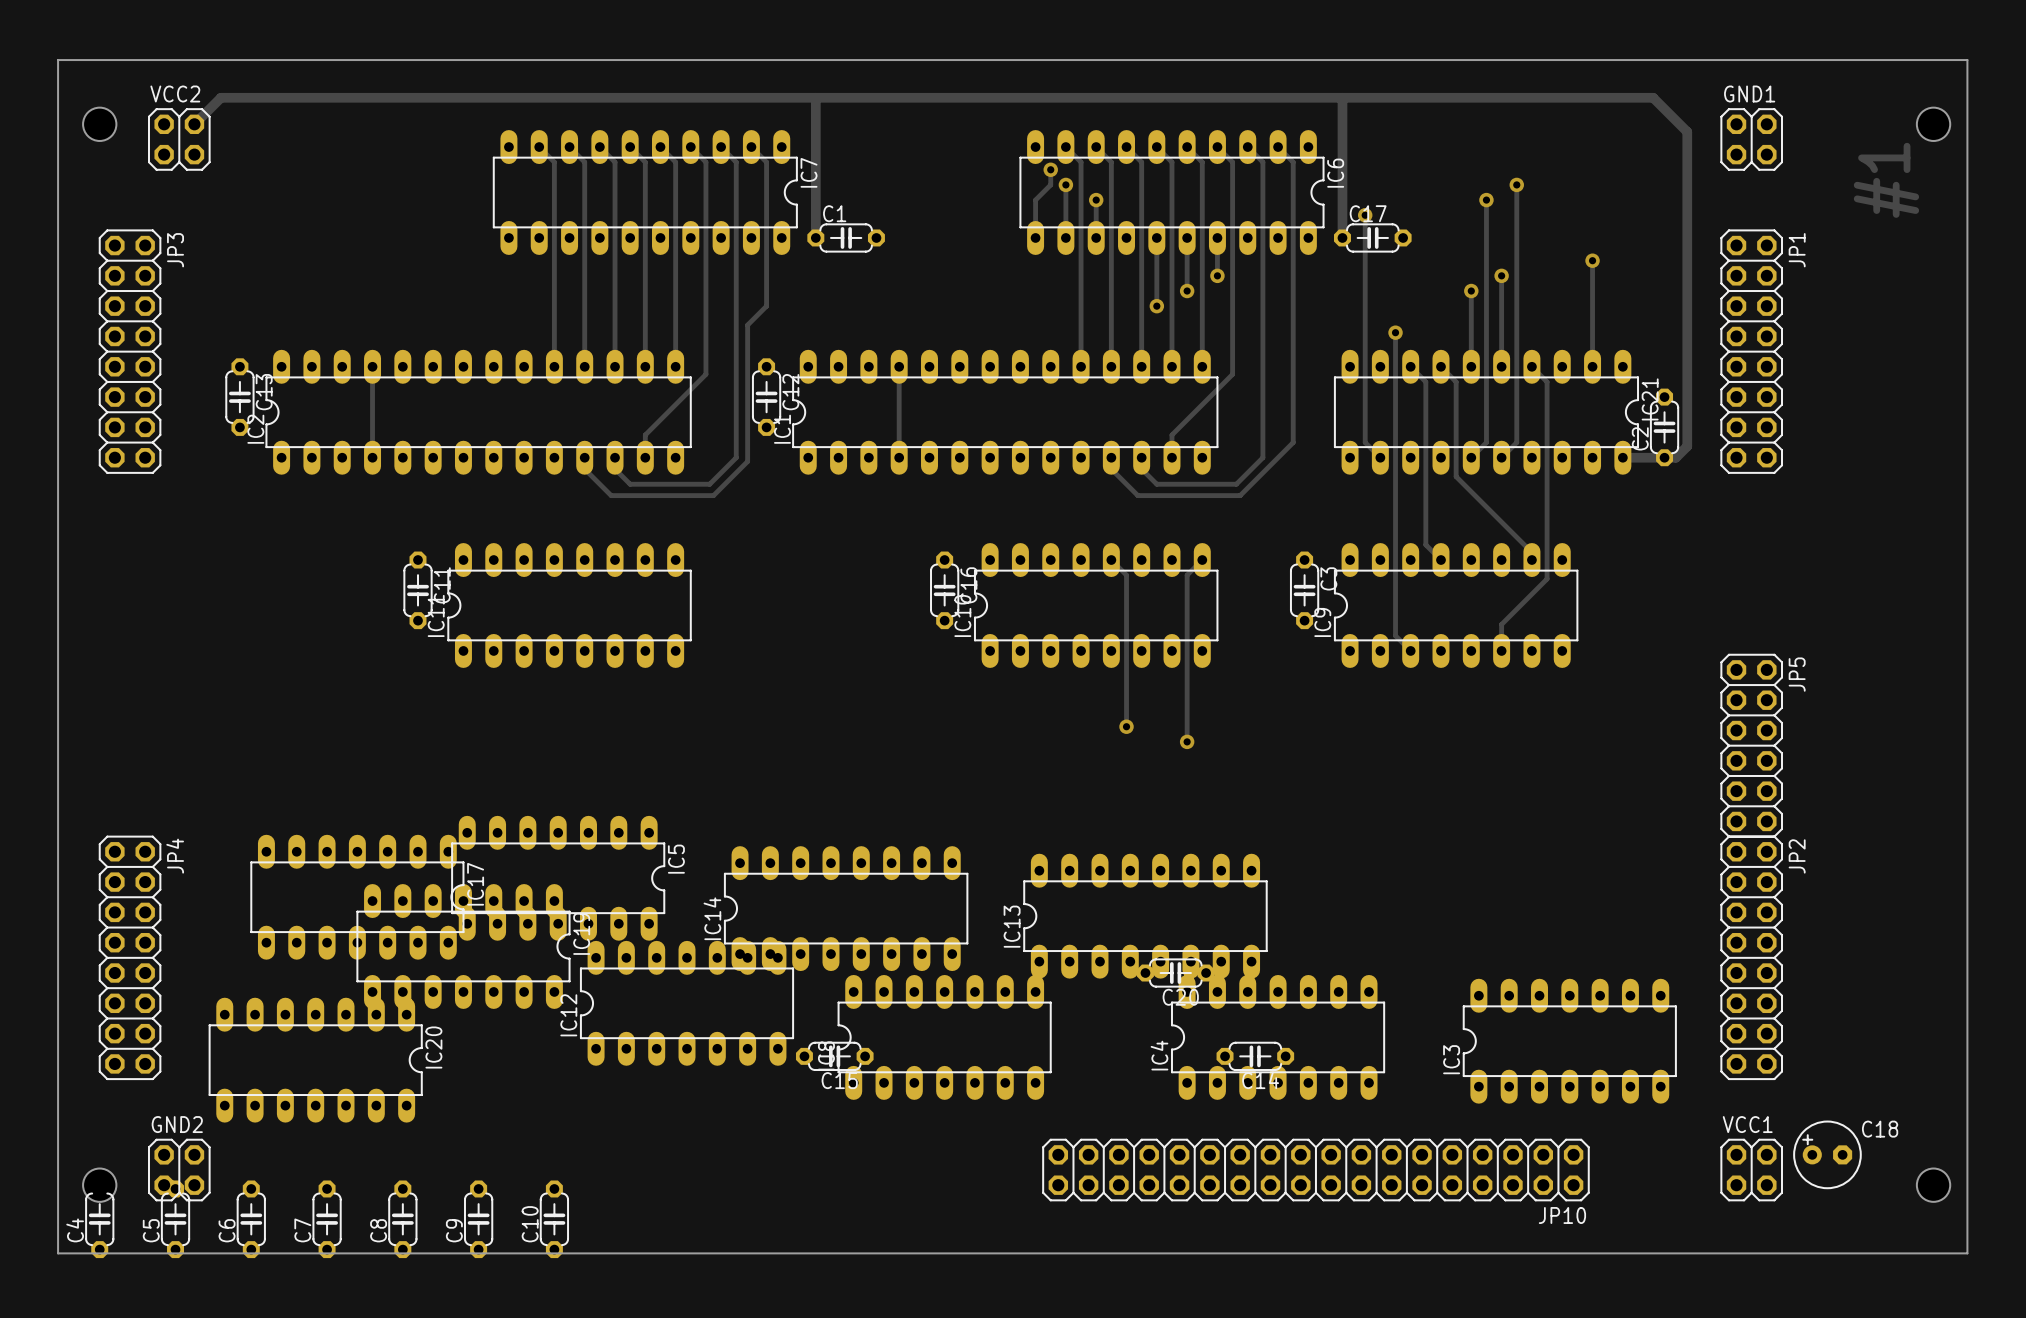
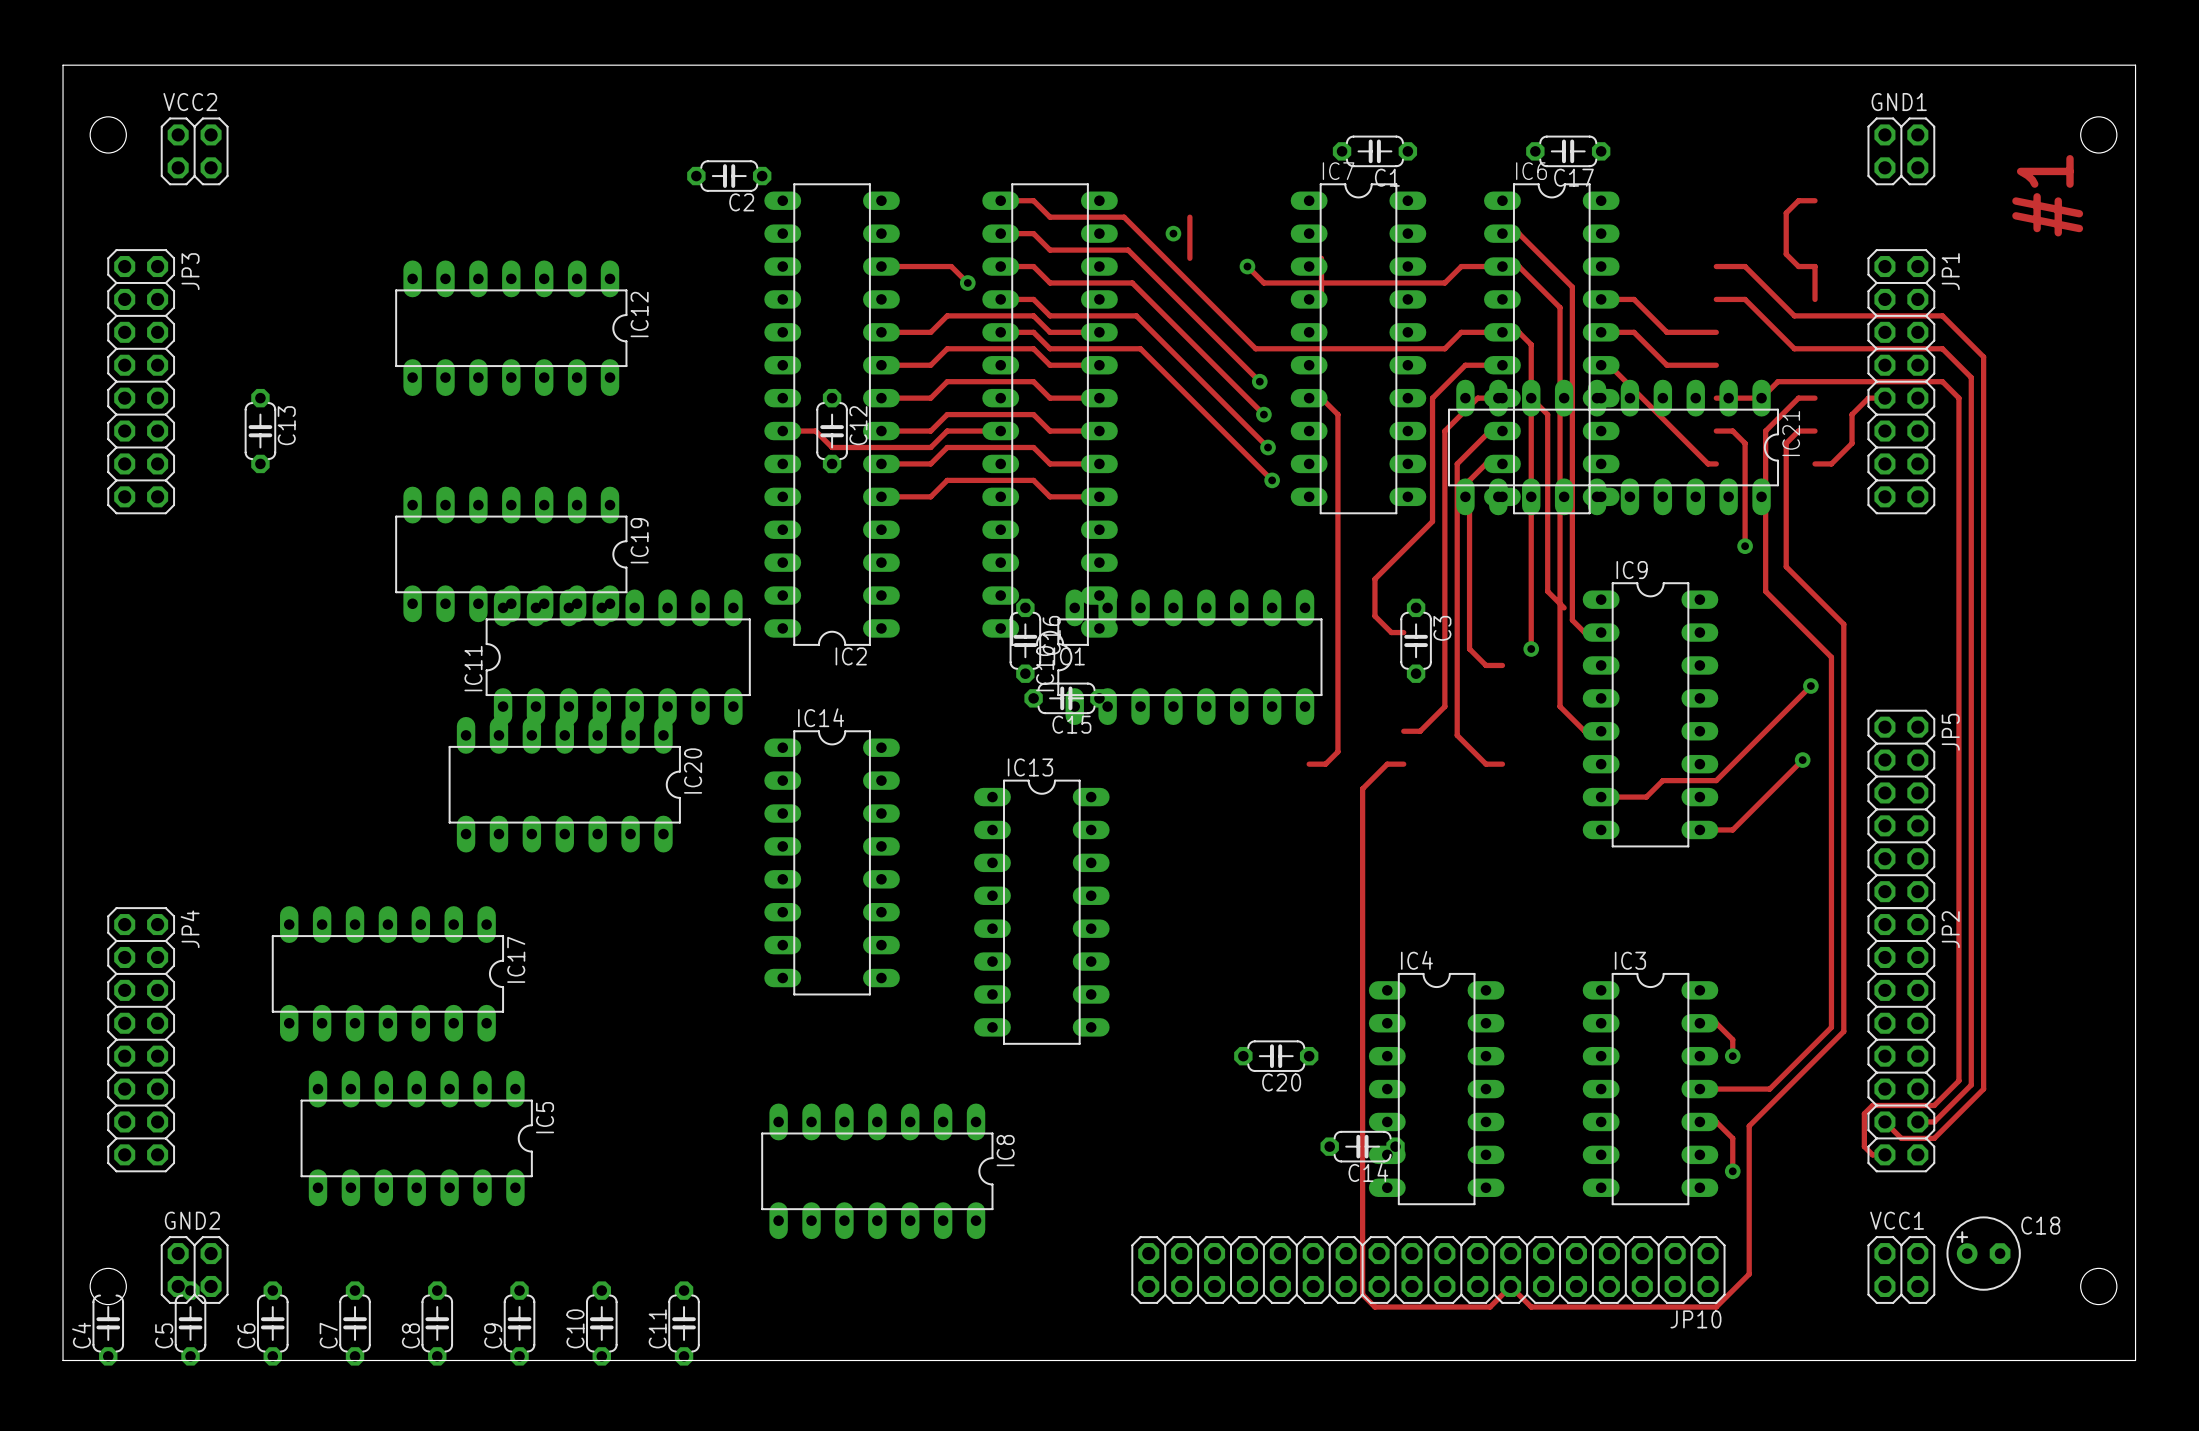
track: (815, 97) (815, 237) -> none
track: (1342, 97) (1342, 237) -> none
track: (194, 124) (220, 97) (1653, 97) (1687, 131) (1687, 446) (1675, 457) (1622, 457) -> none
track: (539, 147) (554, 162) (554, 366) -> none
track: (569, 147) (584, 162) (584, 366) -> none
track: (599, 147) (615, 162) (615, 366) -> none
track: (630, 147) (645, 162) (645, 366) -> none
track: (660, 147) (675, 162) (675, 366) -> none
track: (690, 147) (705, 162) (705, 374) (645, 434) (645, 457) -> none
track: (721, 147) (736, 162) (736, 457) (709, 484) (630, 484) (615, 469) (615, 457) -> none
track: (751, 147) (766, 162) (766, 306) (747, 325) (747, 461) (713, 495) (611, 495) (584, 469) (584, 457) -> none
track: (1065, 147) (1081, 162) (1081, 366) -> none
track: (1096, 147) (1111, 162) (1111, 366) -> none
track: (1126, 147) (1141, 162) (1141, 366) -> none
track: (1156, 147) (1171, 162) (1171, 366) -> none
track: (1187, 147) (1202, 162) (1202, 366) -> none
track: (1217, 147) (1232, 162) (1232, 374) (1171, 434) (1171, 457) -> none
track: (1247, 147) (1262, 162) (1262, 457) (1236, 484) (1156, 484) (1141, 469) (1141, 457) -> none
track: (1278, 147) (1293, 162) (1293, 442) (1240, 495) (1137, 495) (1111, 469) (1111, 457) -> none
track: (1050, 169) (1050, 184) (1035, 200) (1035, 237) -> none
via: (1050, 169) -> none
track: none -> (1000, 200) (1033, 200) (1050, 217) (1124, 217) (1255, 348) (1444, 348) (1461, 332) (1518, 332) (1531, 344) (1531, 649)
track: (1065, 184) (1065, 237) -> none
via: (1065, 184) -> none
track: (1516, 184) (1516, 442) (1501, 457) -> none
via: (1516, 184) -> none
track: none -> (1815, 200) (1798, 200) (1786, 213) (1786, 254) (1798, 266) (1815, 266) (1815, 299)
IC7 rotation: 0° (645, 192) -> 90° counterclockwise (1358, 348)
IC7 position: (645, 192) -> (1358, 348)
IC6 rotation: 0° (1171, 192) -> 90° counterclockwise (1551, 348)
IC6 position: (1171, 192) -> (1551, 348)
via: (1096, 200) -> none
track: (1486, 200) (1486, 442) (1471, 457) -> none
via: (1486, 200) -> none
track: none -> (1000, 233) (1033, 233) (1050, 250) (1128, 250) (1259, 381)
via: none -> (1173, 233)
track: (1365, 215) (1365, 442) (1380, 457) -> none
via: (1365, 215) -> none
track: none -> (1502, 233) (1518, 233) (1572, 287) (1572, 620) (1584, 632) (1601, 632)
C1 rotation: 0° (846, 237) -> 180° (1374, 151)
C1 position: (846, 237) -> (1374, 151)
track: (1156, 237) (1156, 306) -> none
track: (1187, 237) (1187, 291) -> none
C17 rotation: 0° (1372, 237) -> 180° (1568, 151)
C17 position: (1372, 237) -> (1568, 151)
track: none -> (881, 266) (951, 266) (967, 282)
track: none -> (1000, 266) (1033, 266) (1050, 282) (1132, 282) (1263, 414)
track: none -> (1247, 266) (1263, 282) (1444, 282) (1461, 266) (1518, 266) (1560, 307) (1560, 706) (1584, 731) (1601, 731)
via: none -> (1247, 266)
track: none -> (1716, 266) (1745, 266) (1794, 315) (1942, 315) (1983, 357) (1983, 1089) (1934, 1138) (1901, 1138) (1884, 1121)
via: none -> (967, 282)
track: (1592, 260) (1592, 366) -> none
via: (1592, 260) -> none
track: none -> (1000, 299) (1033, 299) (1050, 315) (1136, 315) (1268, 447)
via: (1217, 275) -> none
track: none -> (1601, 299) (1634, 299) (1666, 332) (1716, 332)
track: (1501, 275) (1501, 366) -> none
via: (1501, 275) -> none
track: none -> (1716, 299) (1745, 299) (1794, 348) (1942, 348) (1971, 377) (1971, 1084) (1934, 1121) (1917, 1121)
via: (1187, 291) -> none
track: (1471, 291) (1471, 366) -> none
via: (1471, 291) -> none
track: none -> (881, 332) (930, 332) (947, 315) (1033, 315) (1050, 332) (1099, 332)
track: none -> (1000, 332) (1033, 332) (1050, 348) (1140, 348) (1272, 480)
via: (1156, 306) -> none
track: none -> (1601, 332) (1634, 332) (1666, 365) (1716, 365)
track: (1395, 332) (1395, 635) (1410, 650) -> none
via: (1395, 332) -> none
track: none -> (881, 365) (930, 365) (947, 348) (1033, 348) (1050, 365) (1099, 365)
track: none -> (1502, 365) (1465, 365) (1432, 398) (1432, 521) (1374, 579) (1374, 616) (1391, 632) (1403, 632)
track: none -> (1601, 365) (1609, 365) (1708, 463) (1716, 463)
IC2 footprint: [265, 349, 692, 475] -> [764, 183, 900, 646]
via: none -> (1259, 381)
track: (372, 366) (372, 457) -> none
track: none -> (881, 398) (930, 398) (947, 381) (1033, 381) (1050, 398) (1099, 398)
track: (899, 366) (899, 457) -> none
track: none -> (1309, 398) (1321, 398) (1337, 414) (1337, 751) (1325, 764) (1309, 764)
track: none -> (1502, 398) (1477, 398) (1444, 431) (1444, 706) (1420, 731) (1403, 731)
track: (1440, 366) (1456, 381) (1456, 476) (1531, 552) (1531, 560) -> none
track: (1531, 366) (1547, 381) (1547, 578) (1501, 624) (1501, 650) -> none
track: none -> (1716, 398) (1761, 398) (1778, 381) (1942, 381) (1958, 398) (1958, 1080) (1934, 1105) (1872, 1105) (1864, 1113) (1864, 1146) (1872, 1154) (1884, 1154)
track: none -> (1815, 398) (1798, 398) (1765, 431) (1765, 591) (1831, 657) (1831, 1027) (1769, 1089) (1699, 1089)
track: none -> (1884, 398) (1868, 398) (1852, 414) (1852, 443) (1831, 463) (1815, 463)
via: none -> (1263, 414)
track: none -> (782, 431) (815, 431) (832, 447) (930, 447) (947, 431) (1000, 431)
track: none -> (881, 431) (930, 431) (947, 414) (1033, 414) (1050, 431) (1099, 431)
track: none -> (1502, 431) (1490, 431) (1457, 463) (1457, 735) (1486, 764) (1502, 764)
track: none -> (1716, 431) (1732, 431) (1745, 443) (1745, 546)
track: none -> (1815, 431) (1798, 431) (1786, 443) (1786, 566) (1843, 624) (1843, 1031) (1749, 1126) (1749, 1274) (1716, 1307) (1531, 1307) (1510, 1286) (1490, 1307) (1374, 1307) (1362, 1294) (1362, 788) (1387, 764) (1403, 764)
IC1 rotation: 0° (1005, 412) -> 90° counterclockwise (1050, 414)
via: none -> (1268, 447)
track: none -> (881, 463) (930, 463) (947, 447) (1033, 447) (1050, 463) (1099, 463)
track: none -> (1502, 463) (1486, 463) (1469, 480) (1469, 649) (1486, 665) (1502, 665)
C2 rotation: 0° (1664, 427) -> 90° counterclockwise (729, 176)
C2 position: (1664, 427) -> (729, 176)
IC2 name position: IC2 (255, 429) -> IC2 (851, 656)
via: none -> (1272, 480)
track: none -> (881, 496) (930, 496) (947, 480) (1033, 480) (1050, 496) (1099, 496)
via: none -> (1745, 546)
track: (1111, 560) (1126, 575) (1126, 726) -> none
track: (1202, 560) (1187, 575) (1187, 741) -> none
C11 rotation: 0° (418, 590) -> 180° (684, 1323)
C11 position: (418, 590) -> (684, 1323)
via: none -> (1531, 649)
IC9 rotation: 0° (1456, 605) -> 90° clockwise (1650, 714)
track: none -> (1810, 686) (1716, 780) (1662, 780) (1646, 797) (1601, 797)
via: none -> (1810, 686)
track: none -> (1802, 760) (1732, 829) (1699, 829)
via: none -> (1802, 760)
via: (1126, 726) -> none
via: (1187, 741) -> none
IC5 footprint: [451, 815, 666, 941] -> [300, 1070, 533, 1207]
IC14 footprint: [723, 846, 969, 972] -> [764, 730, 900, 996]
IC13 footprint: [1023, 853, 1268, 979] -> [974, 779, 1110, 1045]
IC14 name position: IC14 (712, 918) -> IC14 (821, 717)
IC13 name position: IC13 (1012, 926) -> IC13 (1030, 767)
track: none -> (1699, 1023) (1716, 1023) (1732, 1039) (1732, 1056)
IC19 position: (463, 946) -> (511, 554)
via: none -> (1732, 1056)
IC12 rotation: 0° (687, 1003) -> 180° (511, 328)
IC12 position: (687, 1003) -> (511, 328)
track: none -> (1699, 1121) (1716, 1121) (1732, 1138) (1732, 1171)
IC8 rotation: 0° (944, 1037) -> 180° (877, 1171)
IC8 position: (944, 1037) -> (877, 1171)
IC4 rotation: 0° (1278, 1037) -> 90° clockwise (1436, 1089)
IC3 rotation: 0° (1569, 1041) -> 90° clockwise (1650, 1089)
C15 position: (834, 1056) -> (1066, 698)
IC20 position: (315, 1060) -> (564, 784)
via: none -> (1732, 1171)

